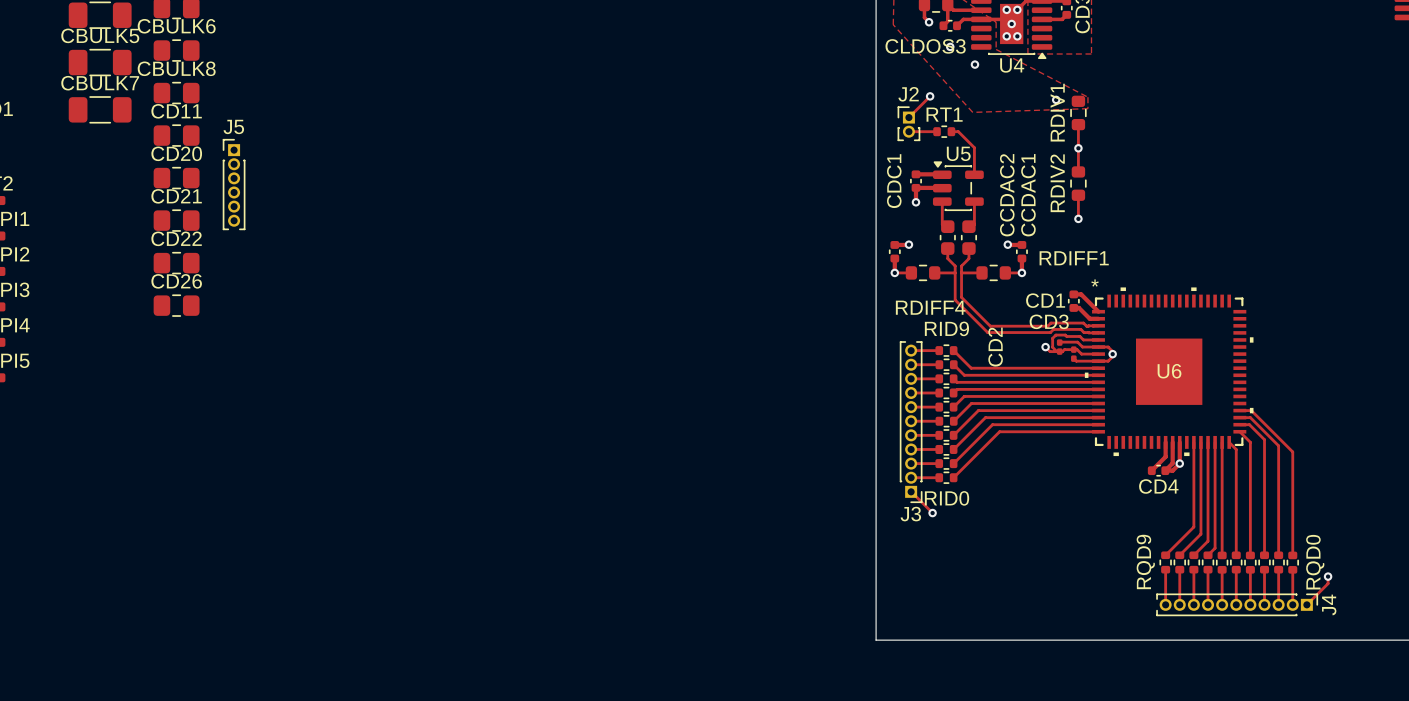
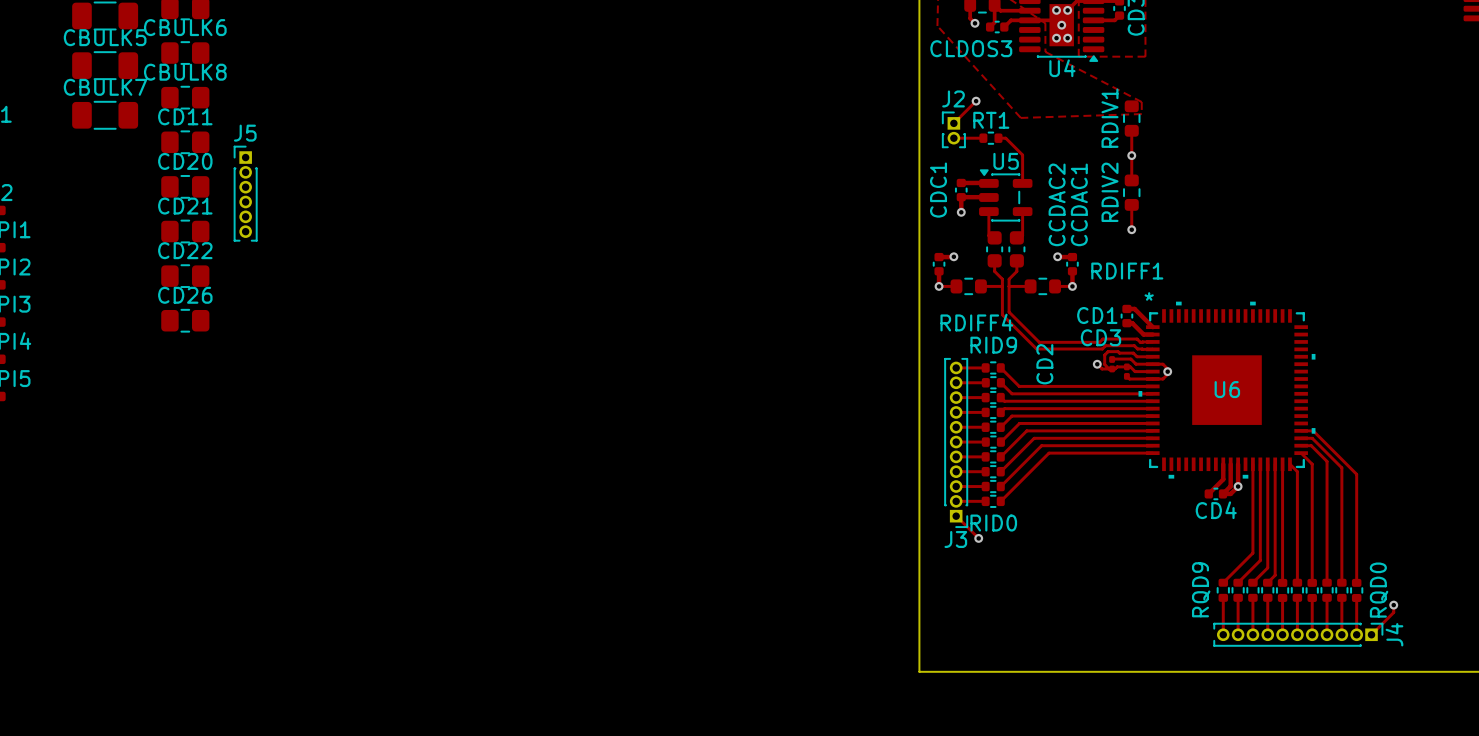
via: (950, 46) -> none
via: (974, 64) -> none
via: (1056, 99) -> none

